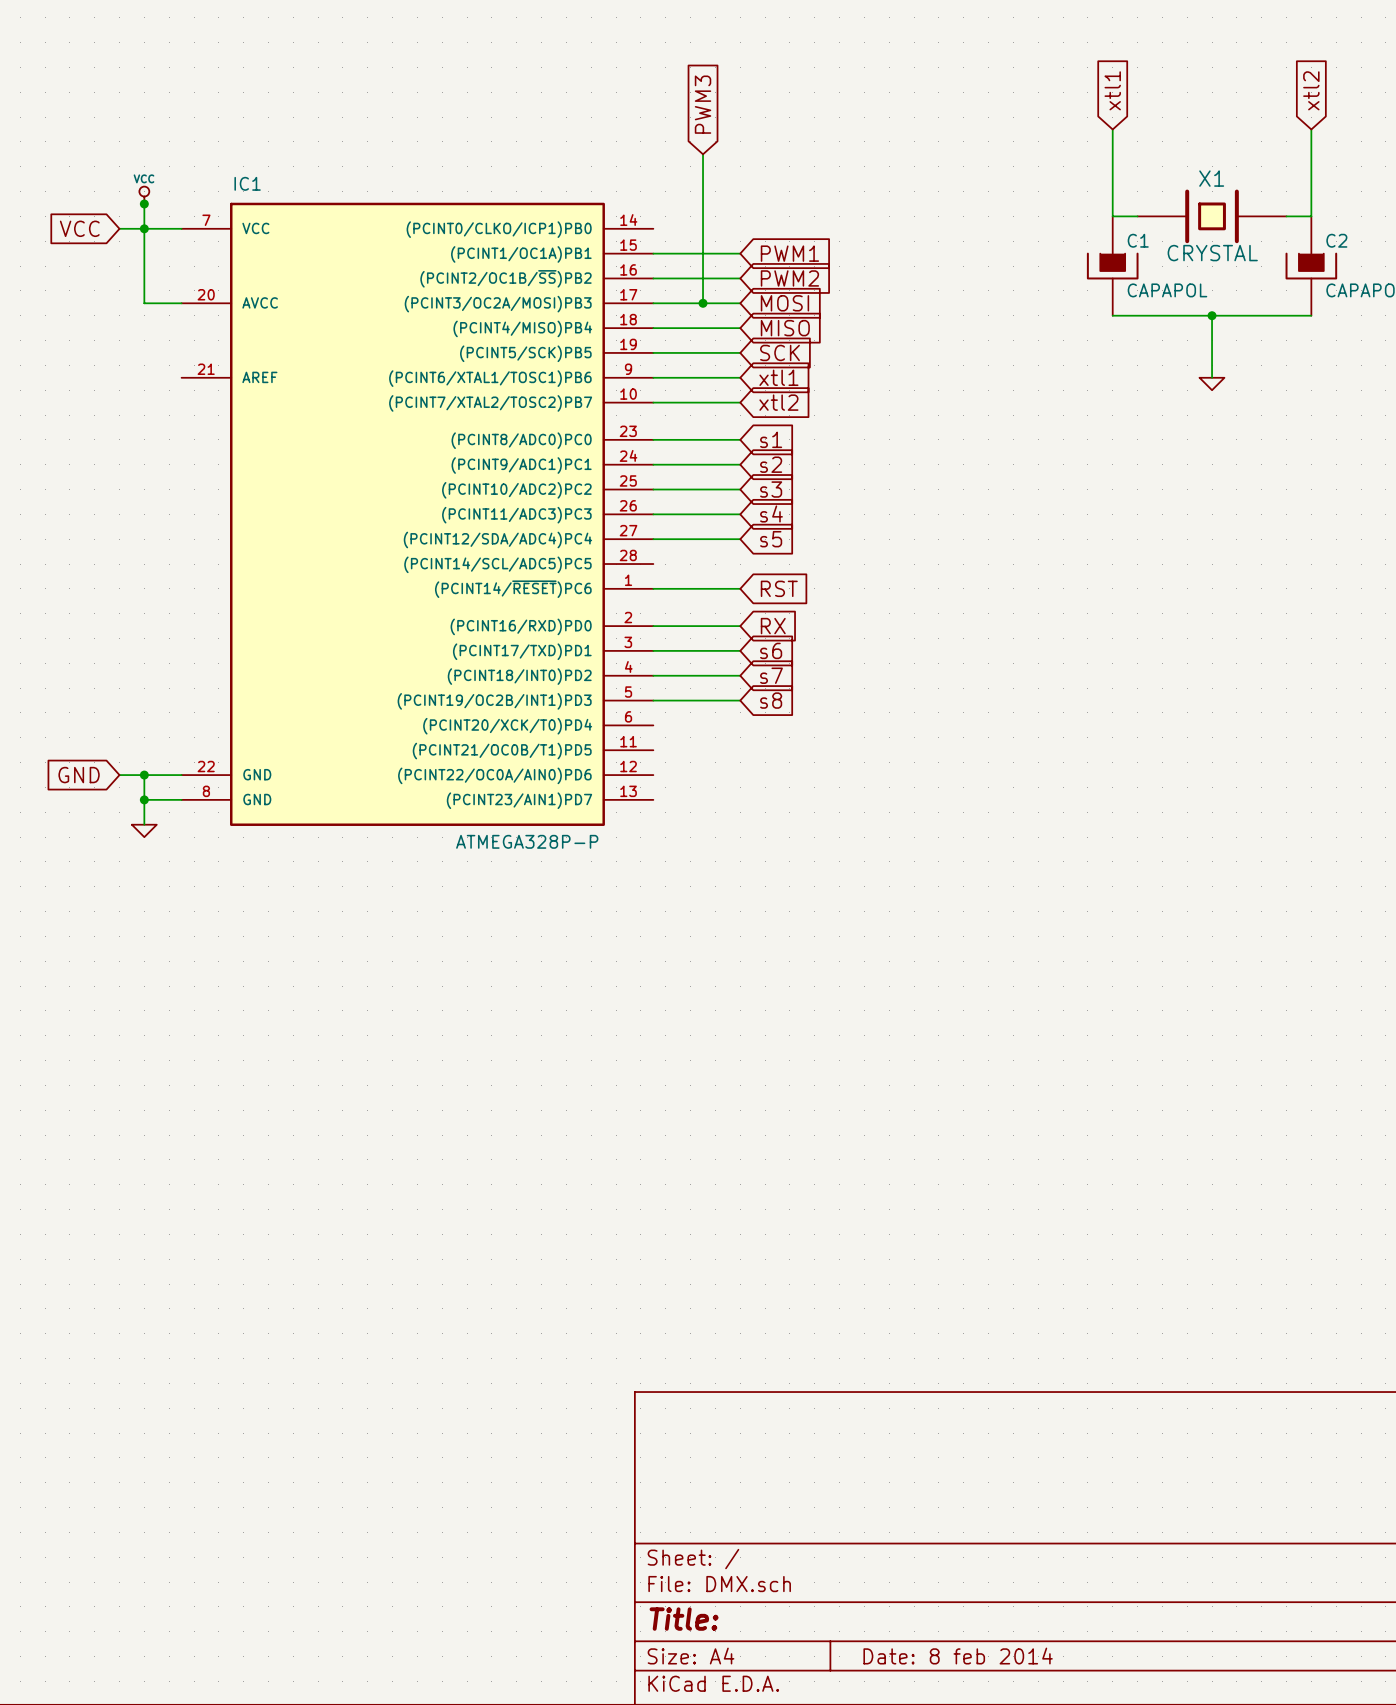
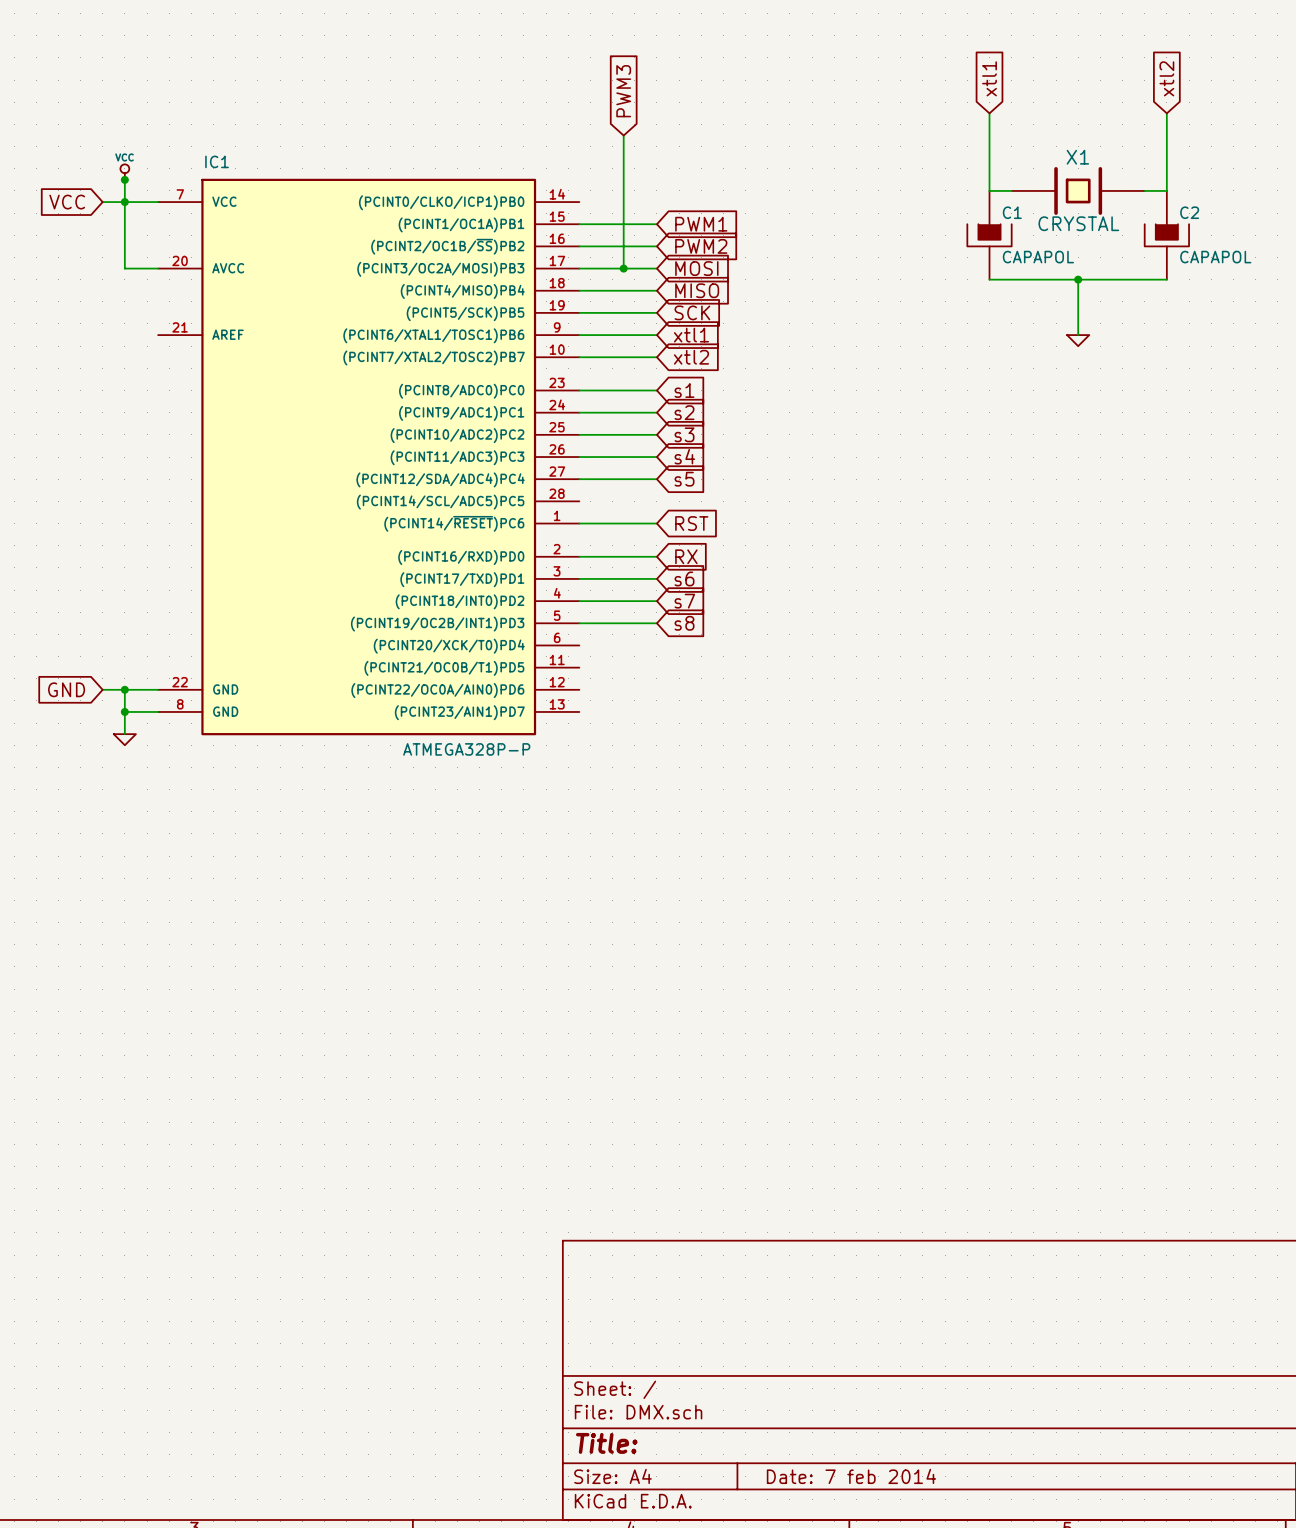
title block: Date: 8 feb 2014 (958, 1656) -> Date: 7 feb 2014 (851, 1476)

